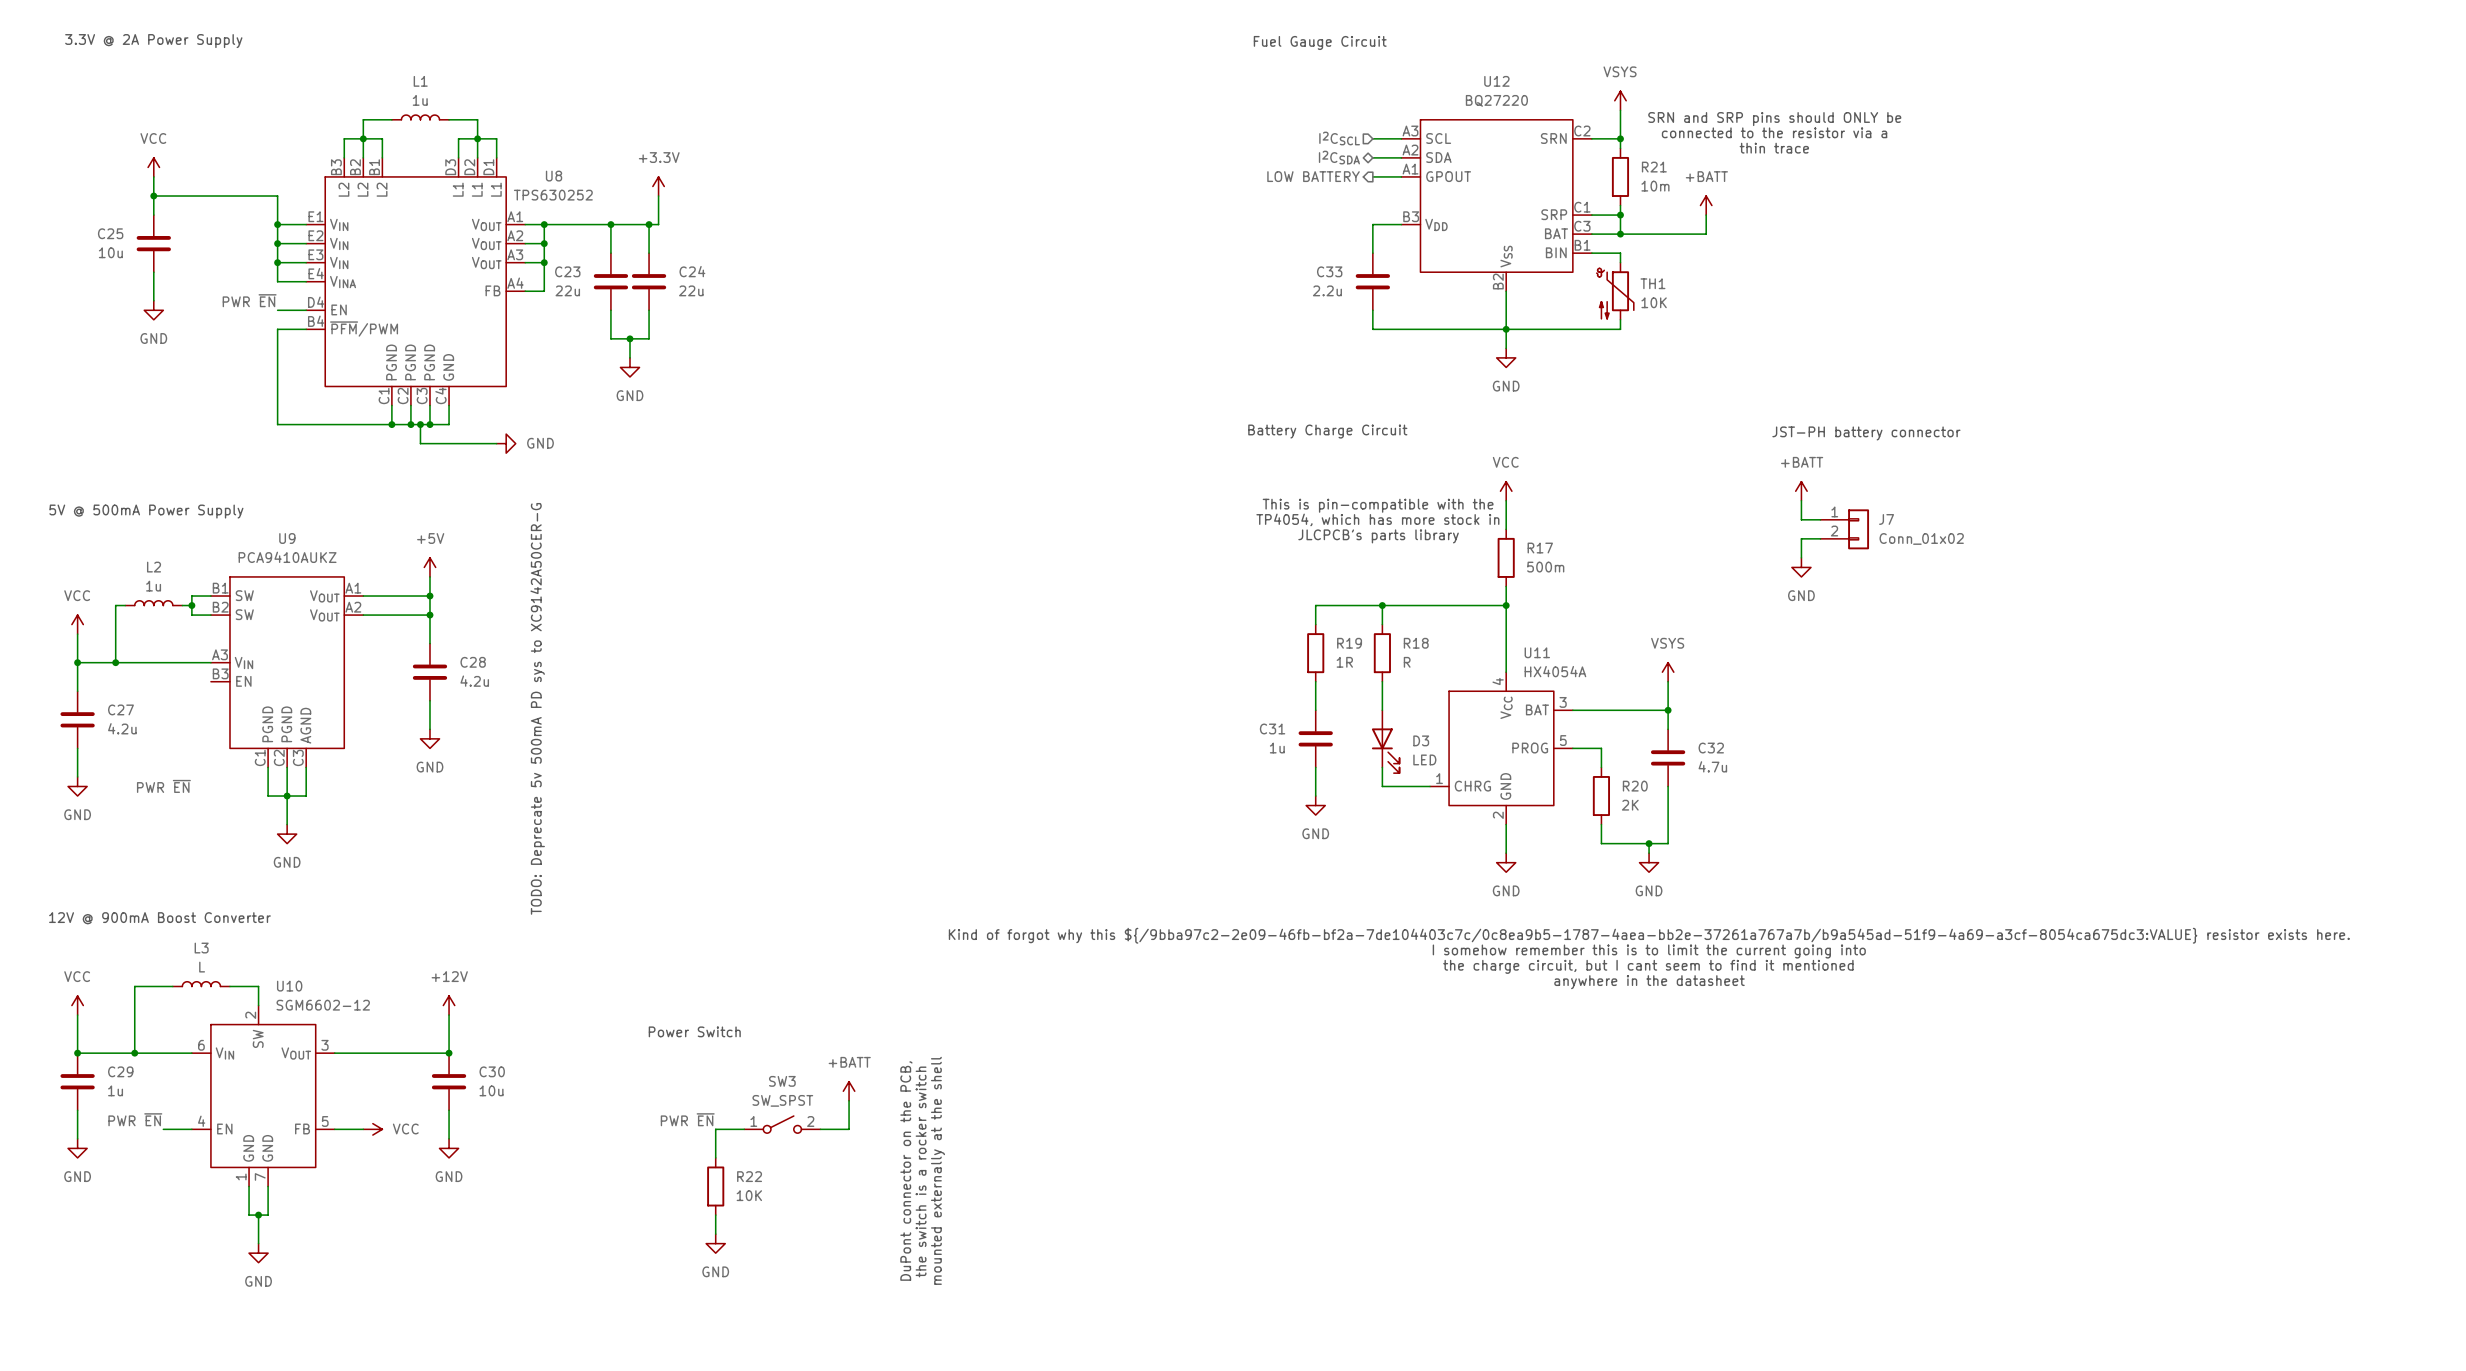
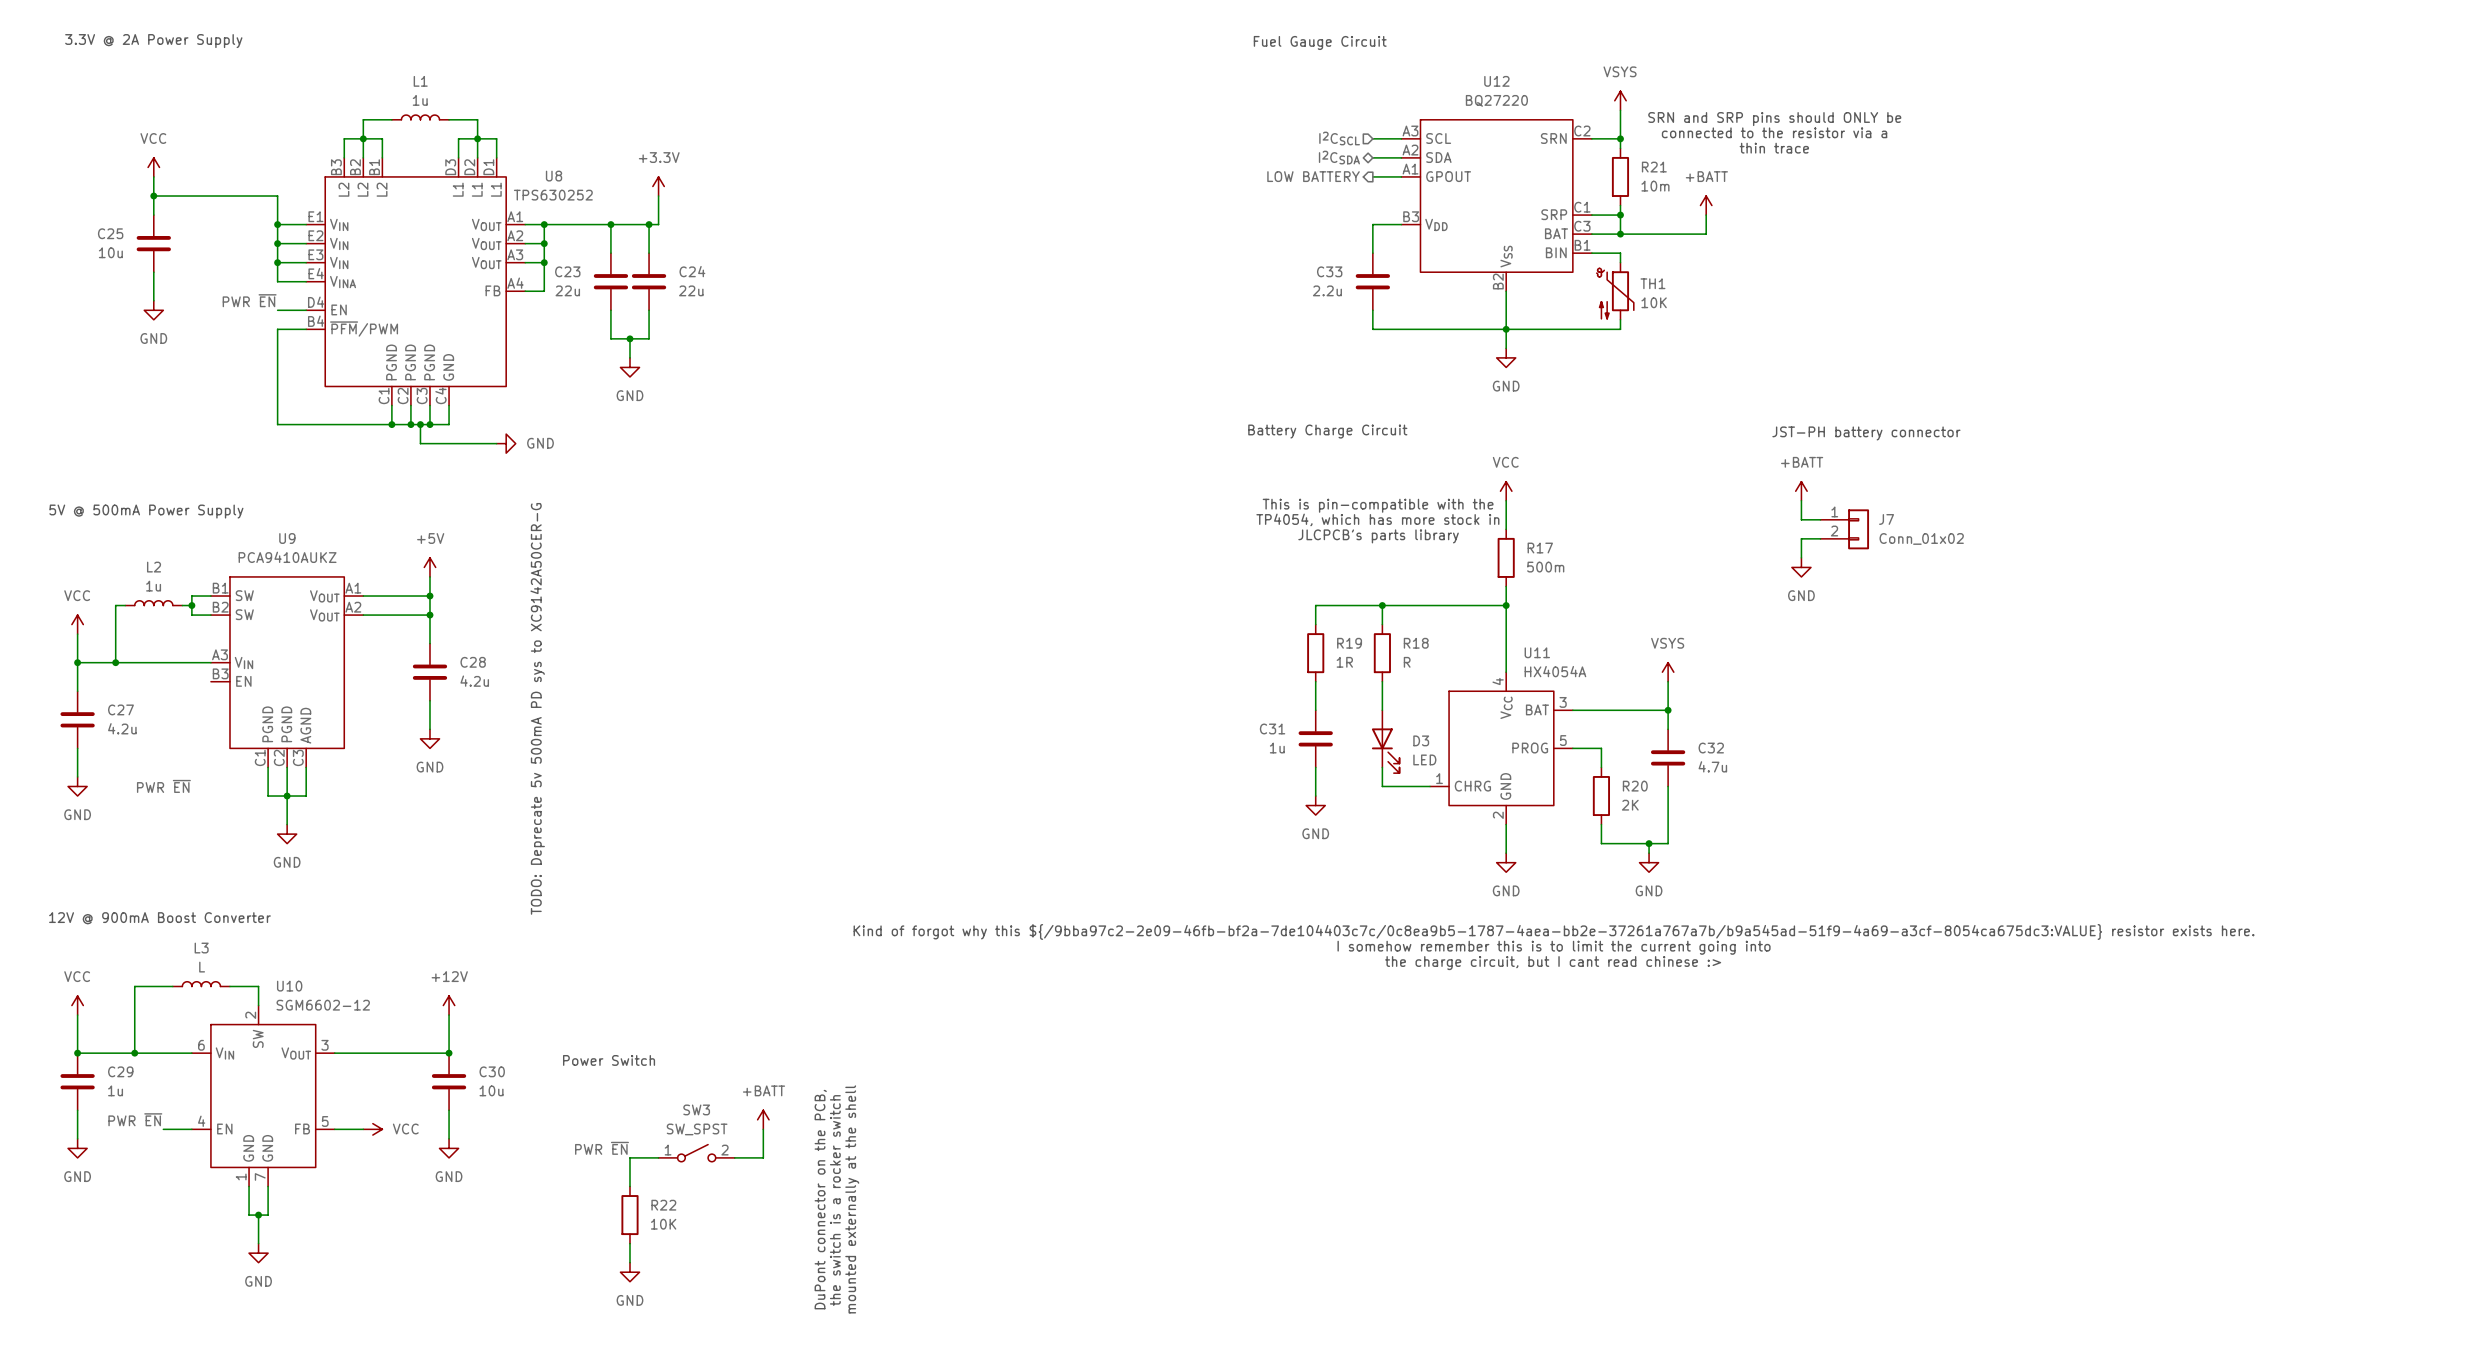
text position: Kind of forgot why this ${/9bba97c2-2e09-46fb-bf2a-7de104403c7c/0c8ea9b5-1787-4aea-bb2e-37261a767a7b/b9a545ad-51f9-4a69-a3cf-8054ca675dc3:VALUE} resistor exists here. (1649, 935) -> Kind of forgot why this ${/9bba97c2-2e09-46fb-bf2a-7de104403c7c/0c8ea9b5-1787-4aea-bb2e-37261a767a7b/b9a545ad-51f9-4a69-a3cf-8054ca675dc3:VALUE} resistor exists here. (1554, 931)
text position: I somehow remember this is to limit the current going into (1649, 951) -> I somehow remember this is to limit the current going into (1554, 947)
text: the charge circuit, but I cant seem to find it mentioned (1648, 966) -> the charge circuit, but I cant read chinese :> (1553, 963)
text: anywhere in the datasheet (1649, 982) -> none
text position: Power Switch (694, 1031) -> Power Switch (609, 1060)
power symbol position: +BATT (849, 1091) -> +BATT (763, 1119)
wire: (849, 1100) (849, 1129) (820, 1129) -> (763, 1129) (763, 1157) (734, 1157)
label position: PWR ~{EN} (687, 1119) -> PWR ~{EN} (602, 1148)
SW3 position: (782, 1124) -> (696, 1153)
wire: (744, 1129) (715, 1129) (715, 1157) -> (658, 1157) (629, 1157) (629, 1186)
text position: mounted externally at the shell (937, 1170) -> mounted externally at the shell (852, 1199)
text position: DuPont connector on the PCB, (906, 1171) -> DuPont connector on the PCB, (820, 1199)
text position: the switch is a rocker switch (921, 1171) -> the switch is a rocker switch (835, 1200)
R22 position: (715, 1186) -> (629, 1215)
wire: (715, 1215) (715, 1234) -> (629, 1243) (629, 1262)
power symbol position: GND (715, 1243) -> GND (629, 1272)

